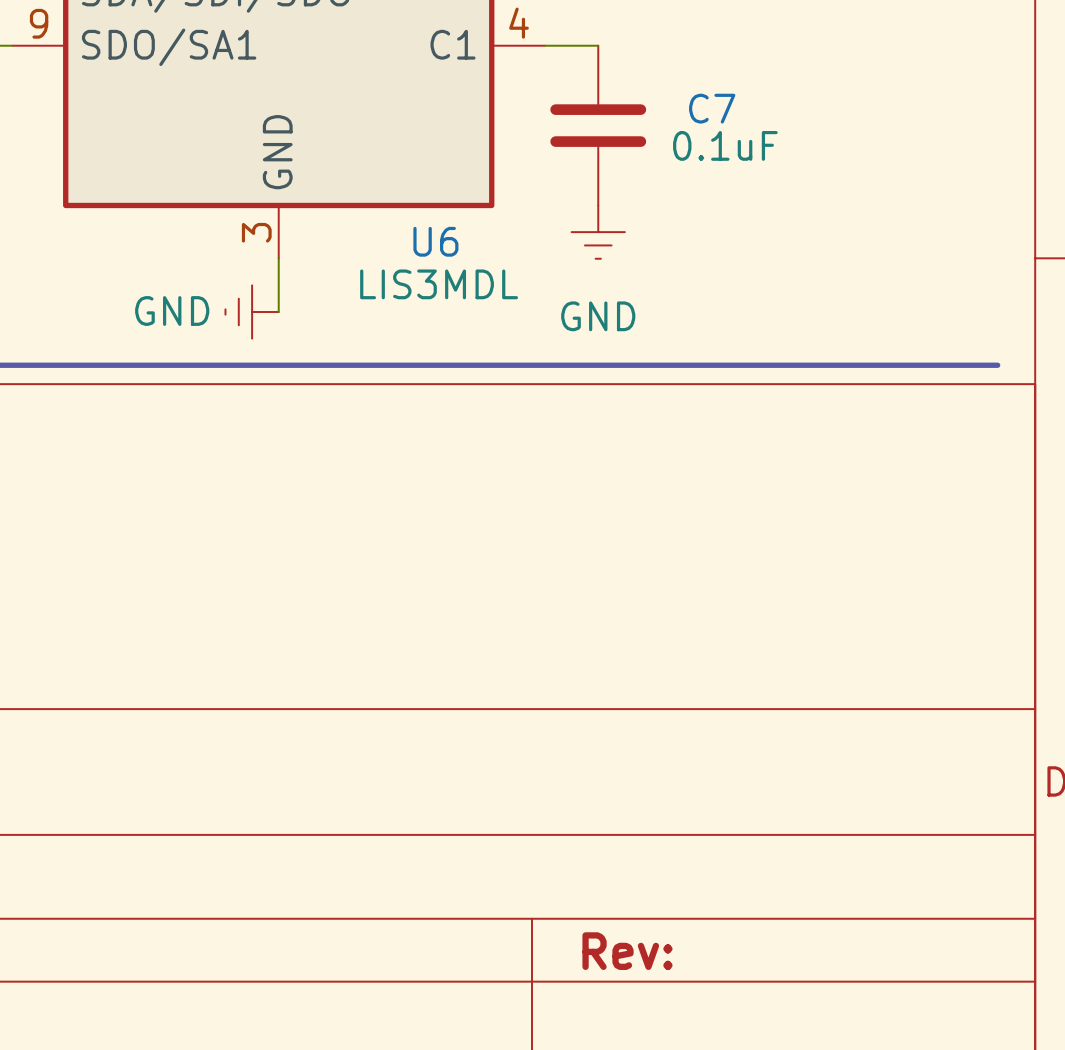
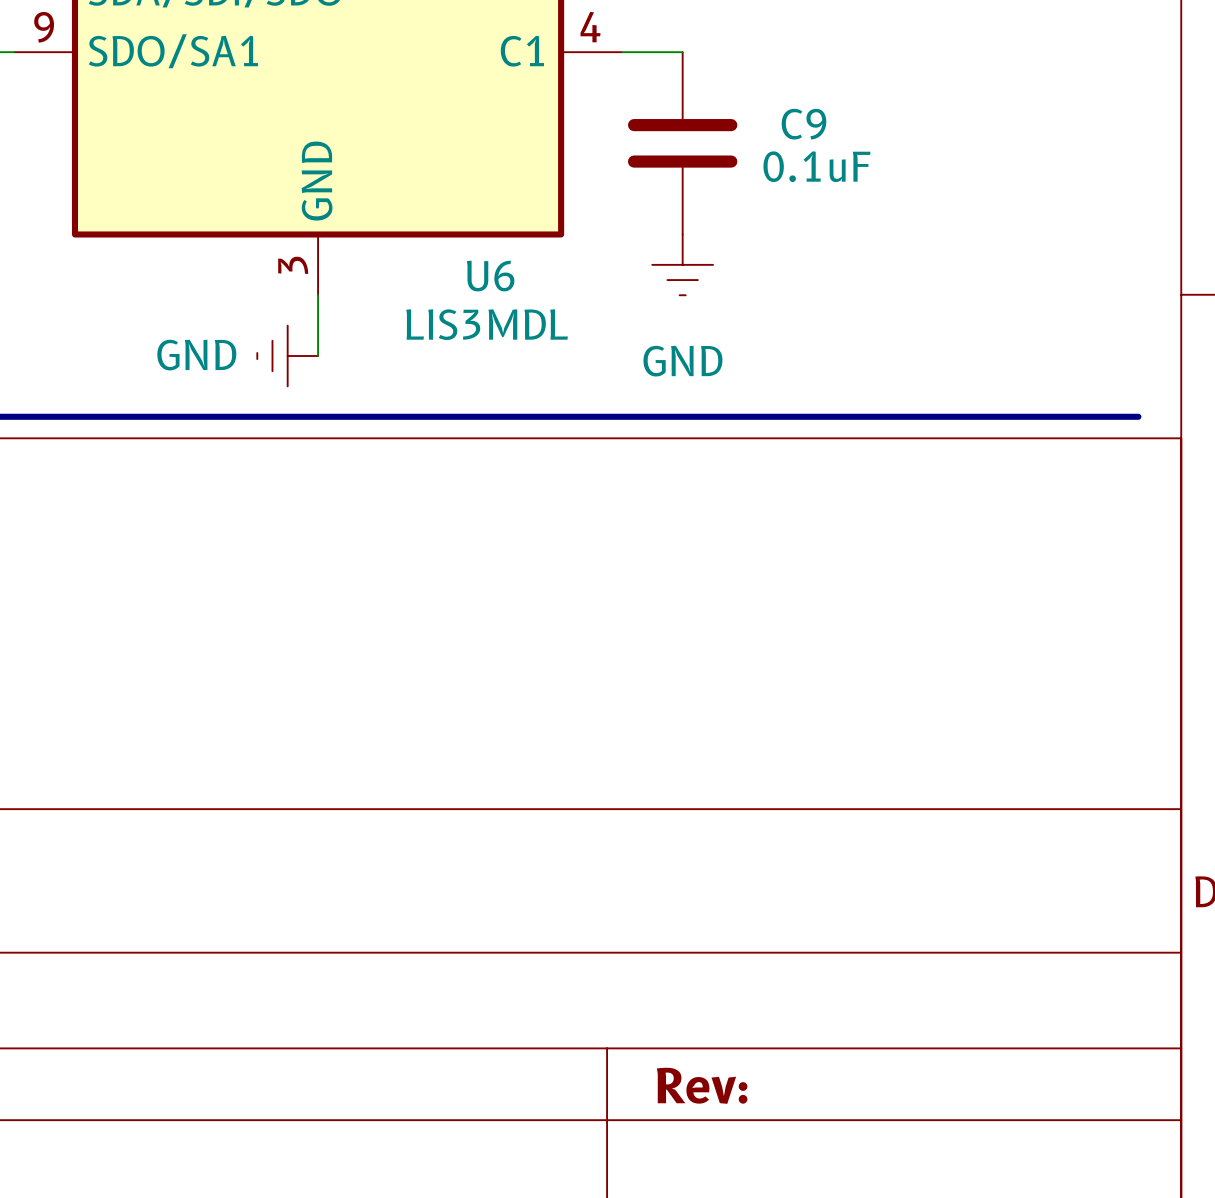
C7 name: C7 (712, 108) -> C9 (803, 124)

